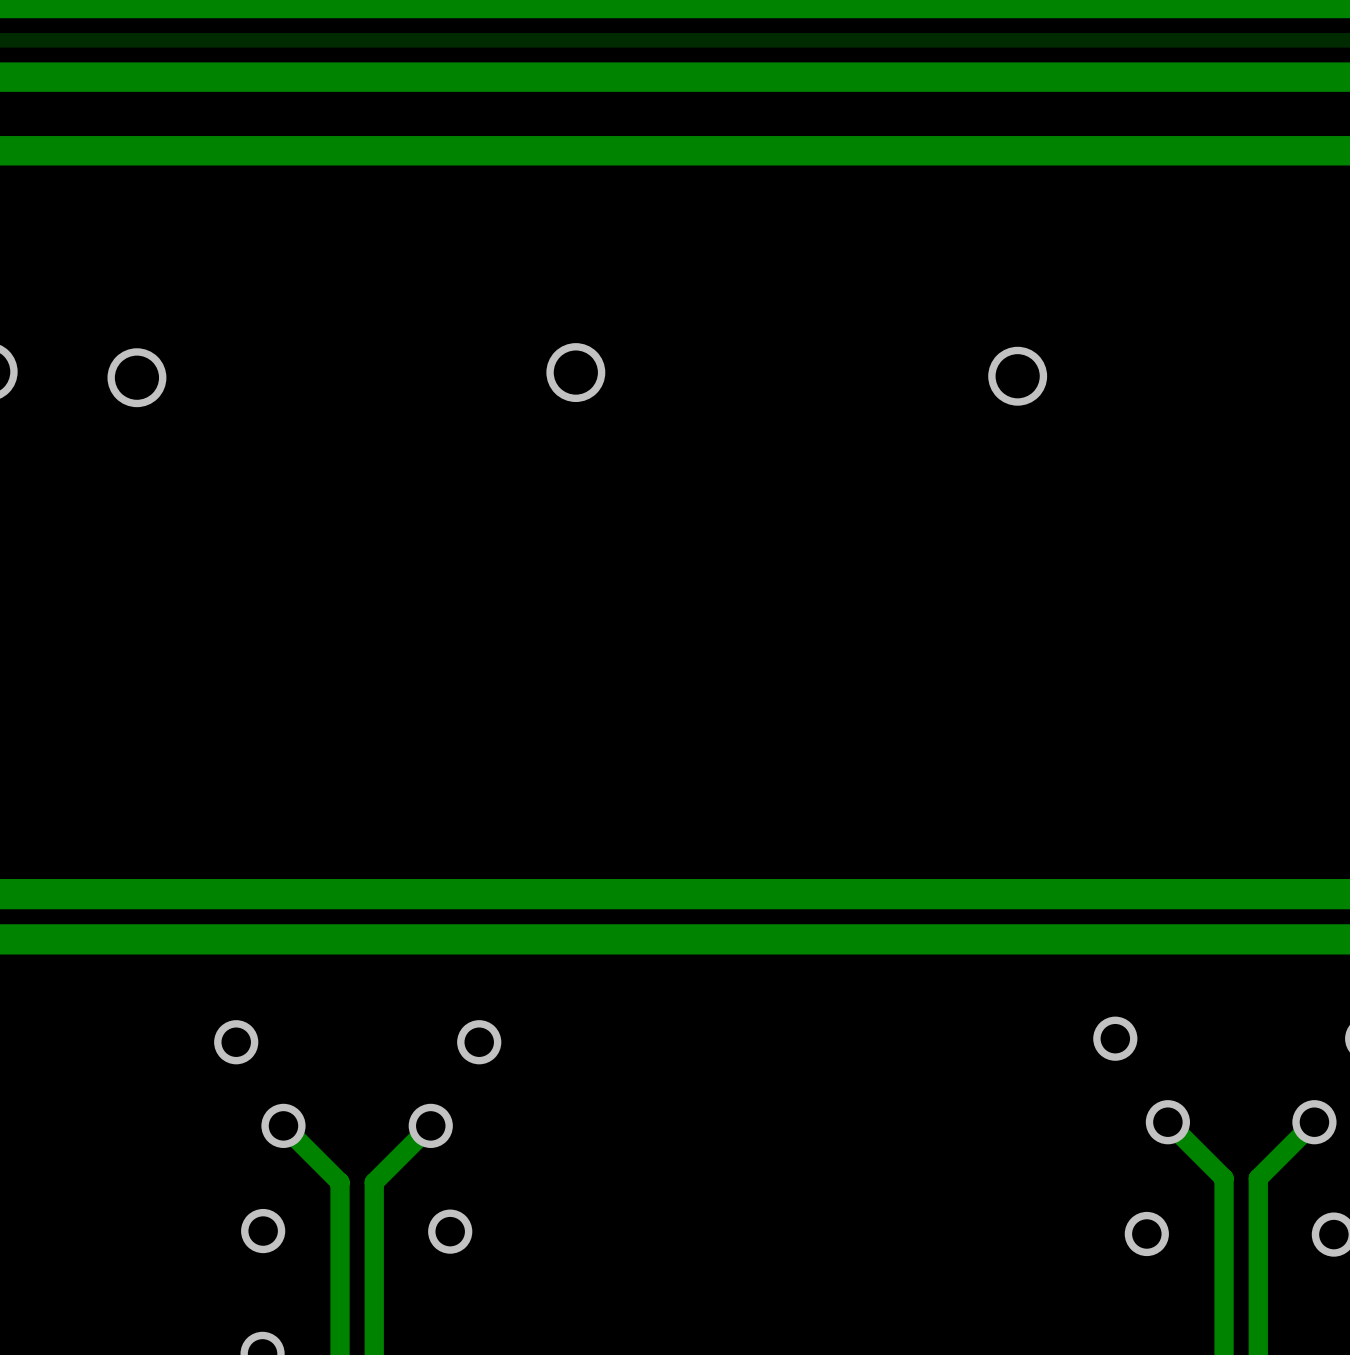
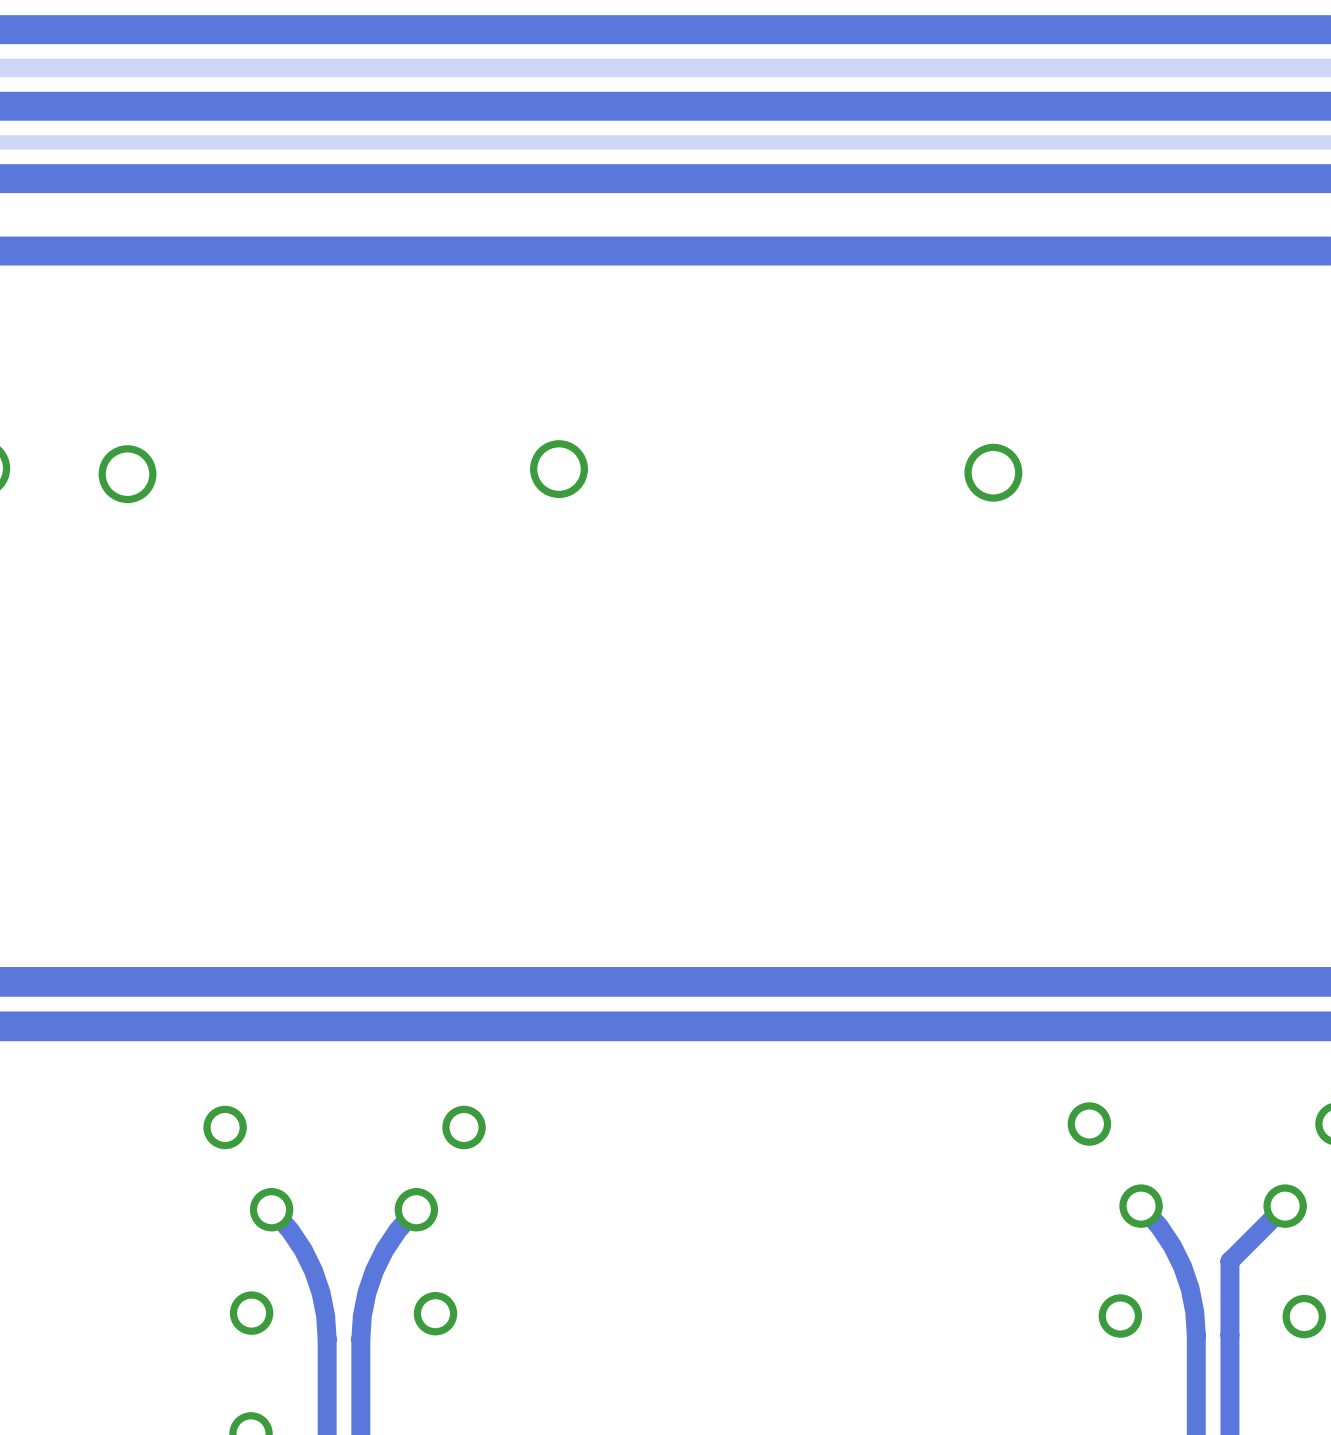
track: (1170, 1125) (1224, 1178) (1224, 1253) -> (1144, 1209) (1159, 1226) (1172, 1246) (1182, 1266) (1190, 1289) (1194, 1311) (1196, 1335)
track: (286, 1129) (340, 1182) (340, 1257) -> (274, 1213) (290, 1230) (303, 1250) (313, 1270) (321, 1293) (325, 1315) (327, 1339)
track: (427, 1129) (374, 1182) (374, 1257) -> (413, 1213) (397, 1230) (384, 1250) (374, 1270) (366, 1293) (362, 1315) (360, 1339)

